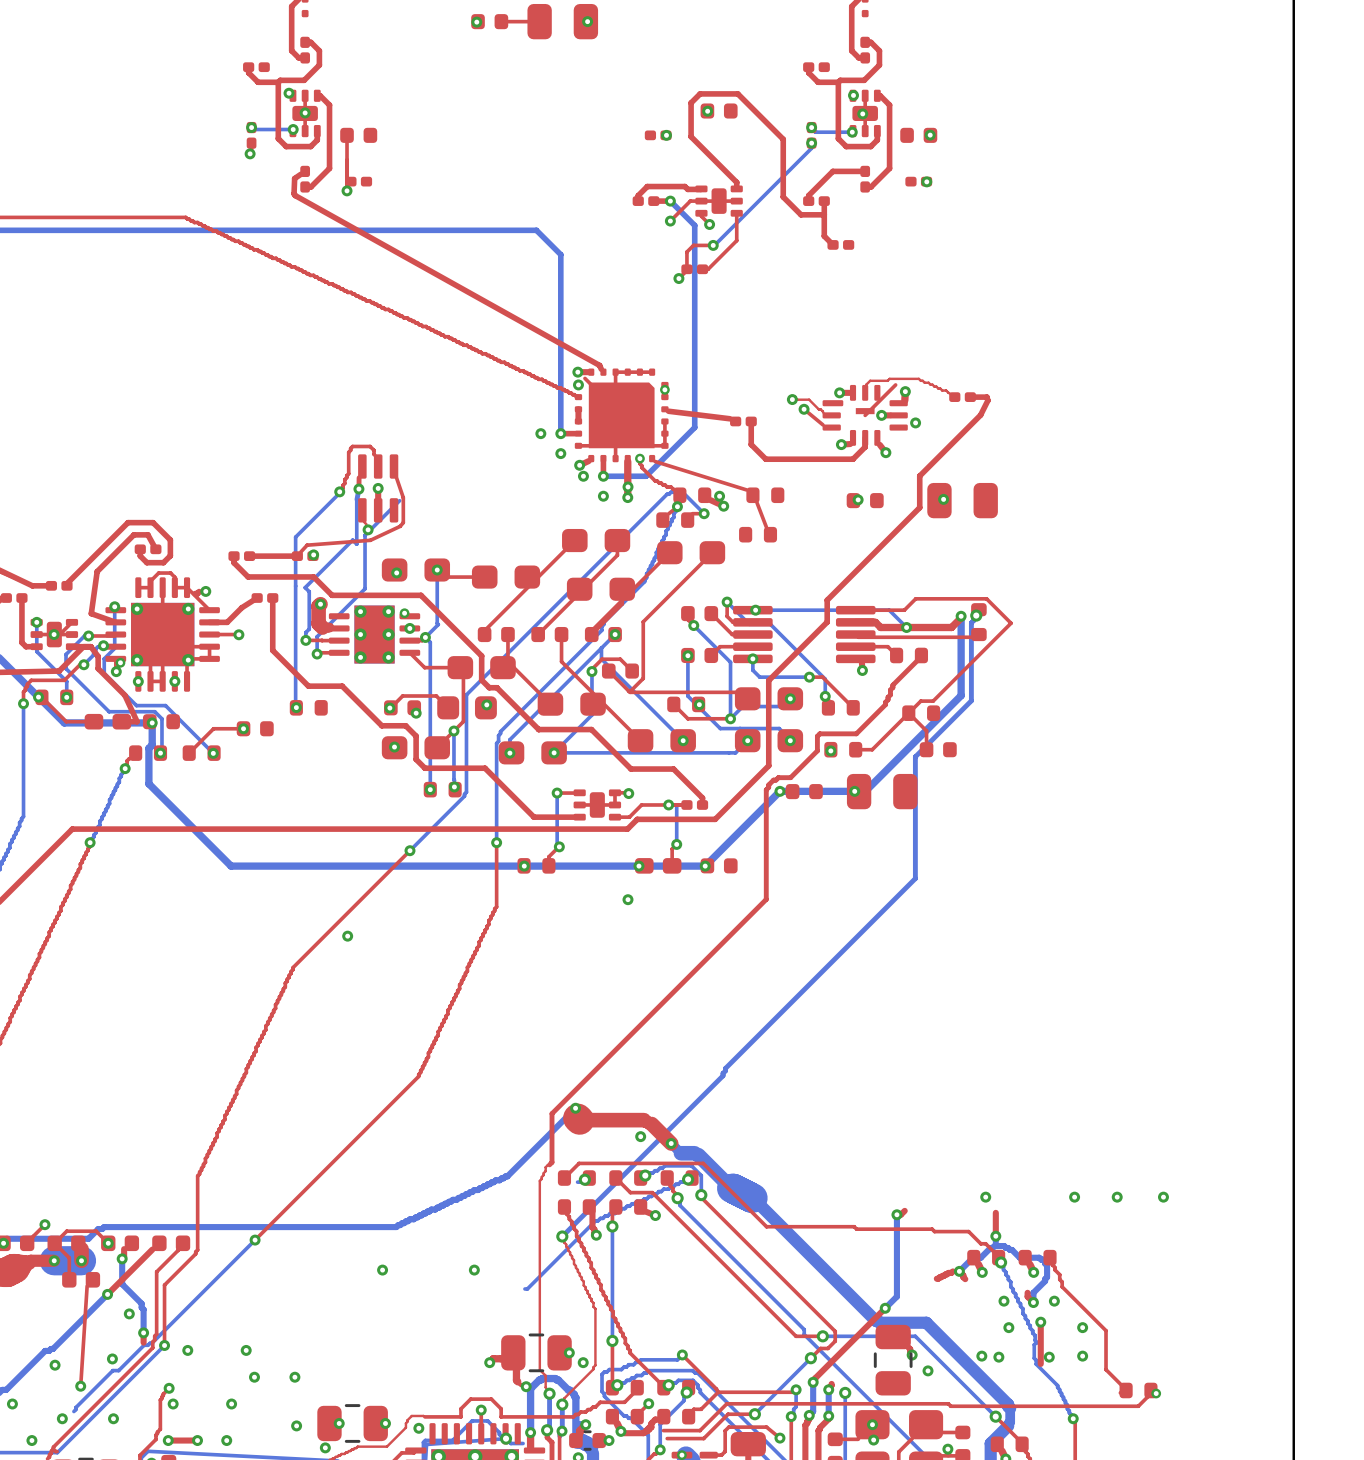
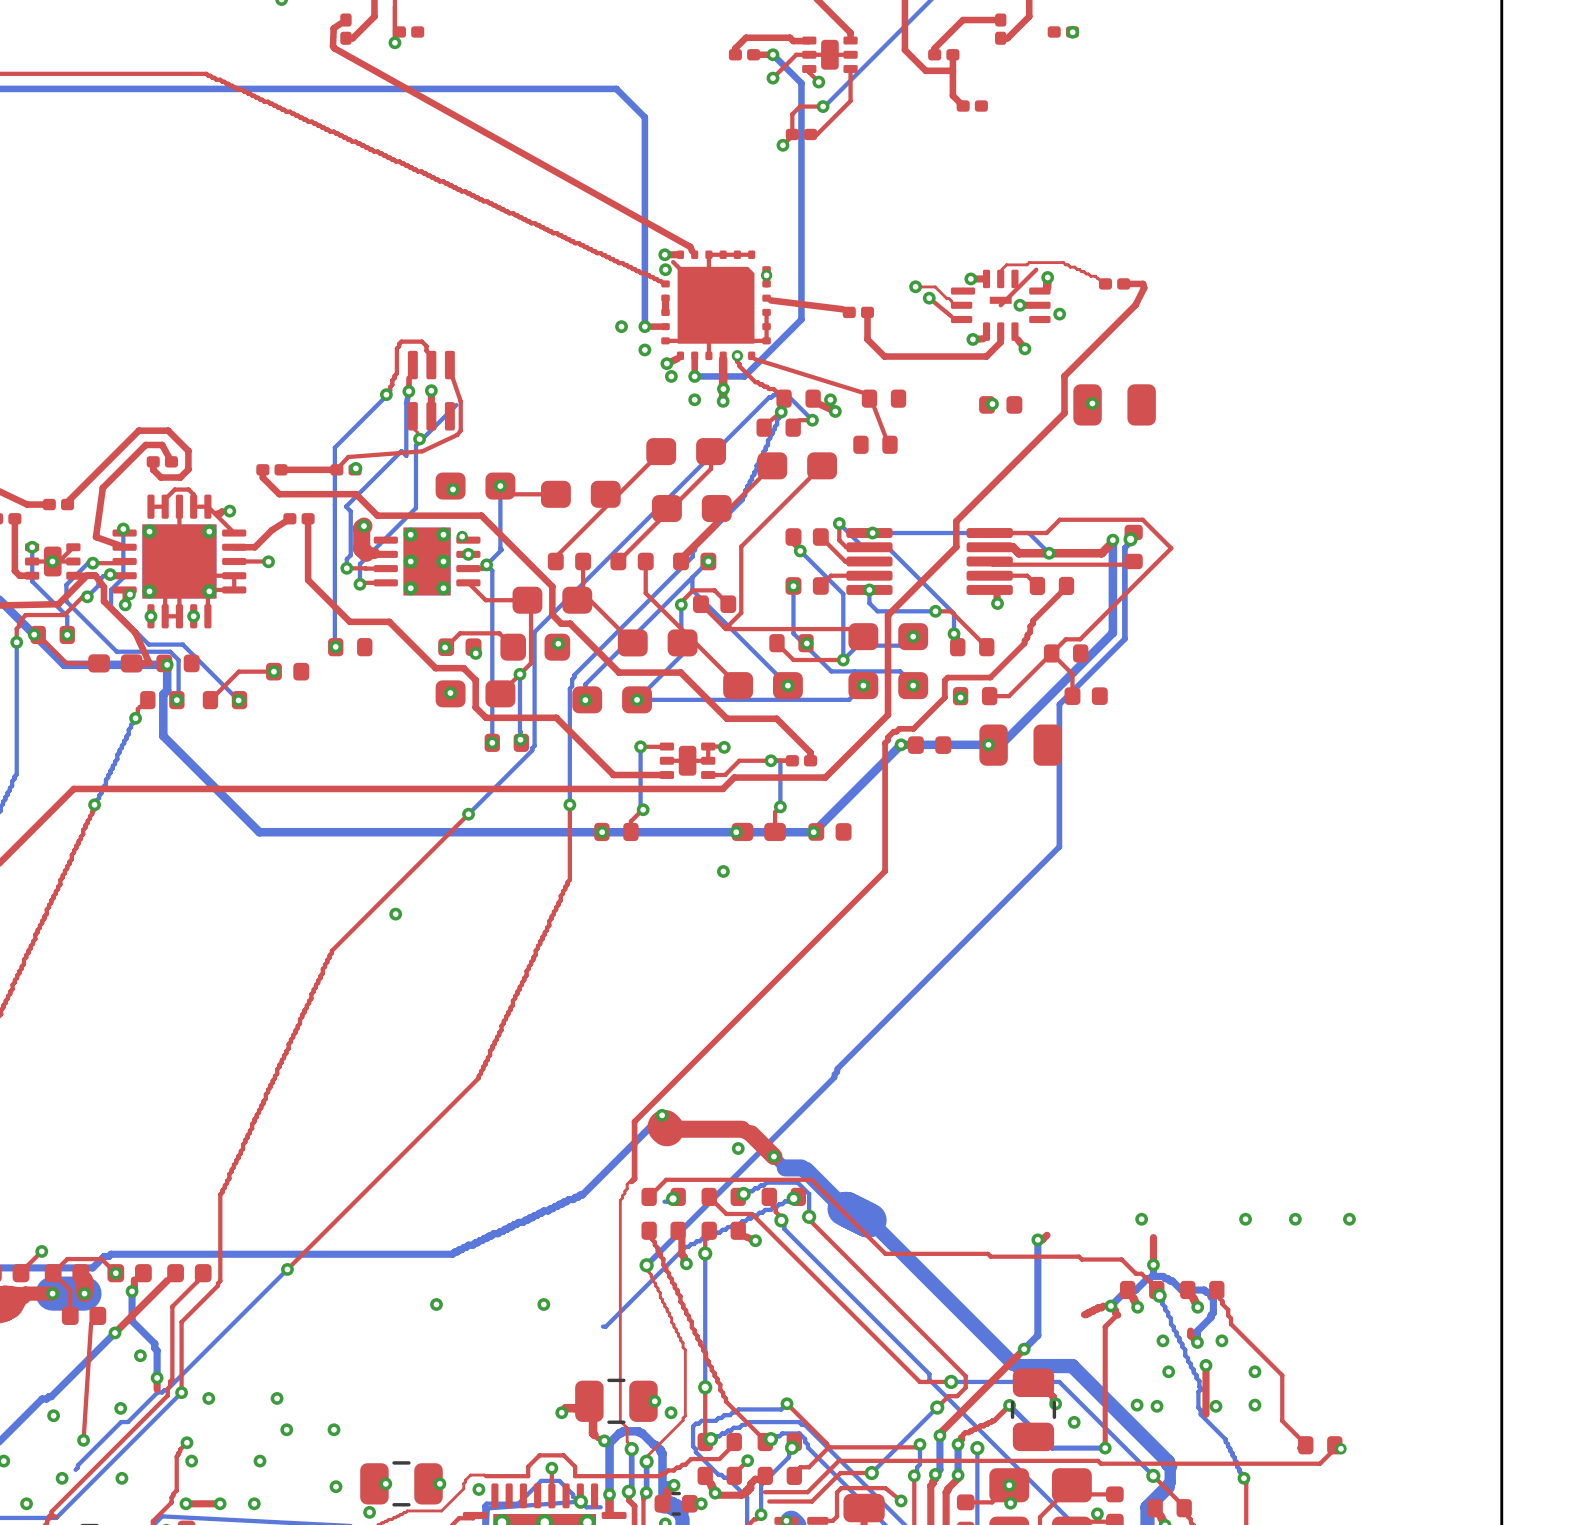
top track: none -> (1115, 1316) (1105, 1326) (1105, 1448)
top track: none -> (1009, 1405) (994, 1420) (963, 1435)
bottom track: none -> (1009, 1405) (1052, 1448) (1105, 1448)
via: none -> (1009, 1405)
via: none -> (1105, 1448)

